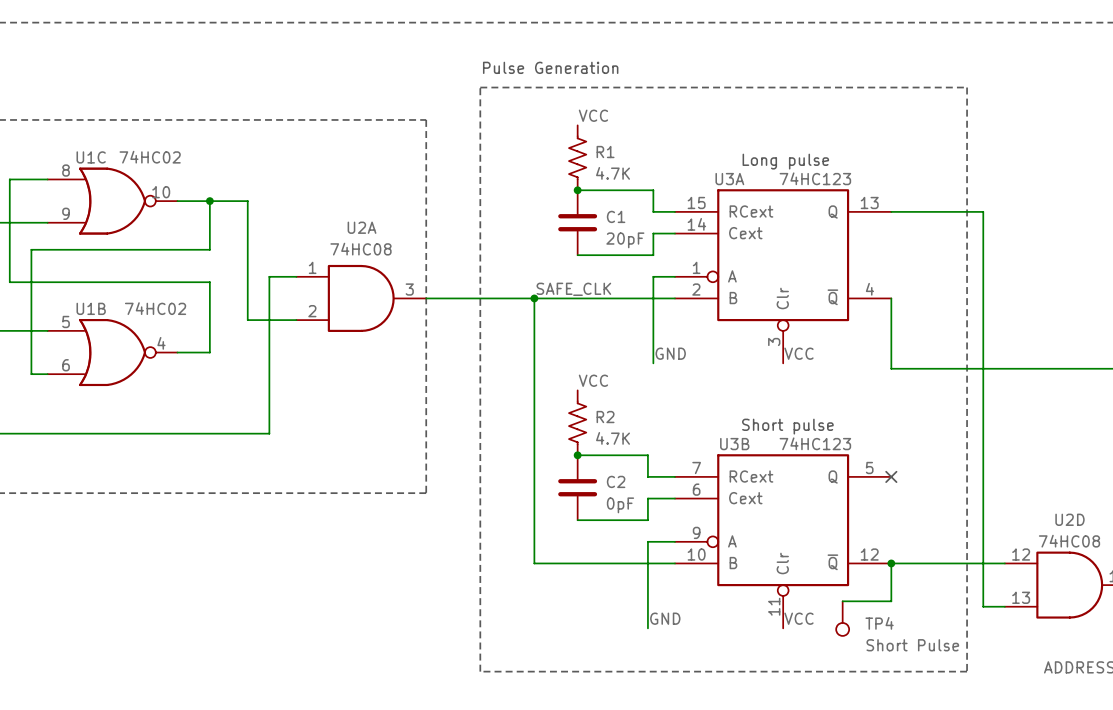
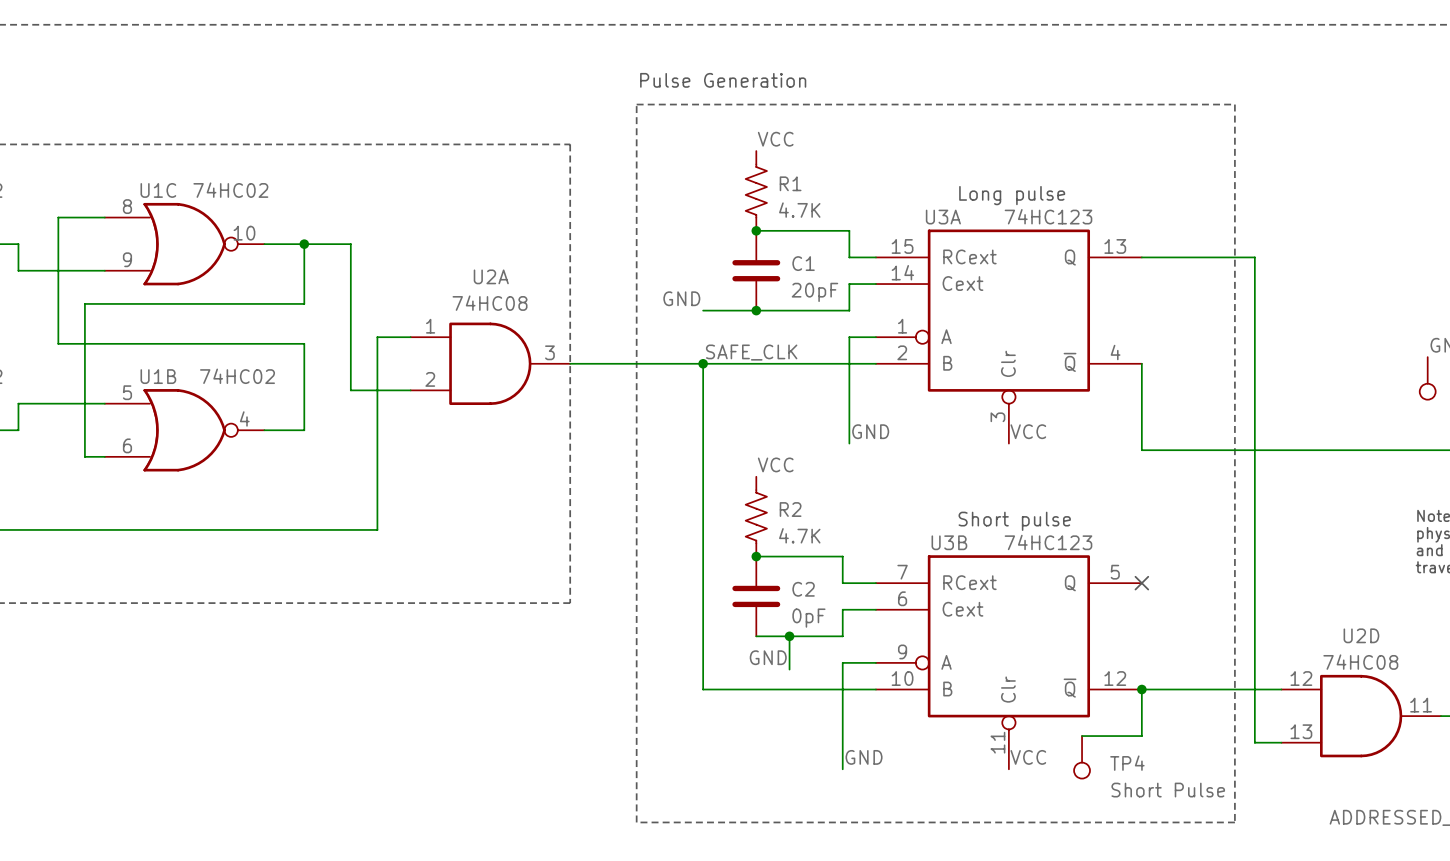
label: none -> GND (681, 298)
wire: none -> (703, 310) (756, 310)
junction: none -> (756, 310)
wire: none -> (789, 636) (789, 669)
junction: none -> (789, 636)
label: none -> GND (768, 657)

